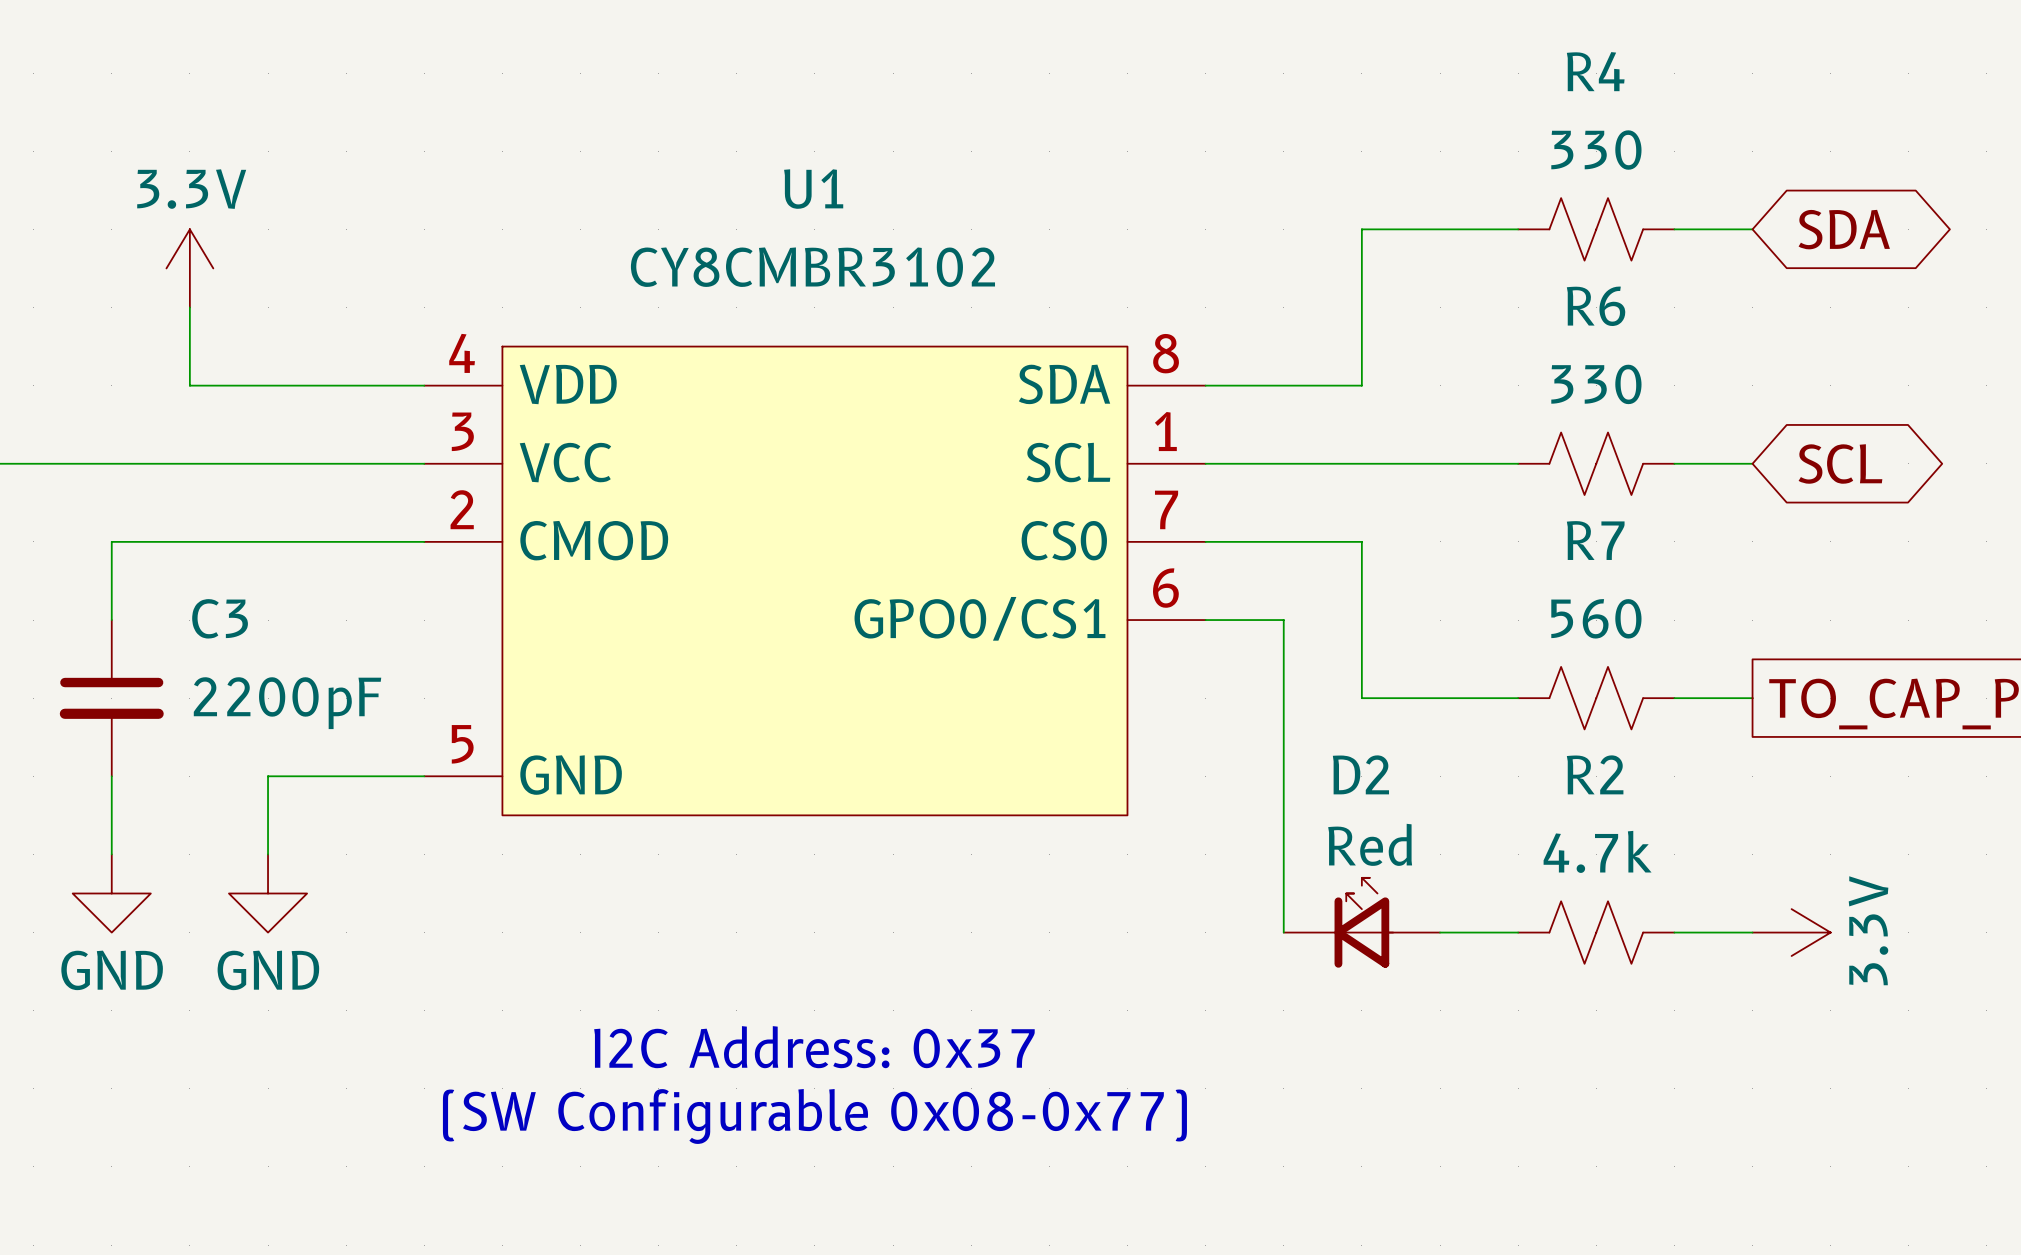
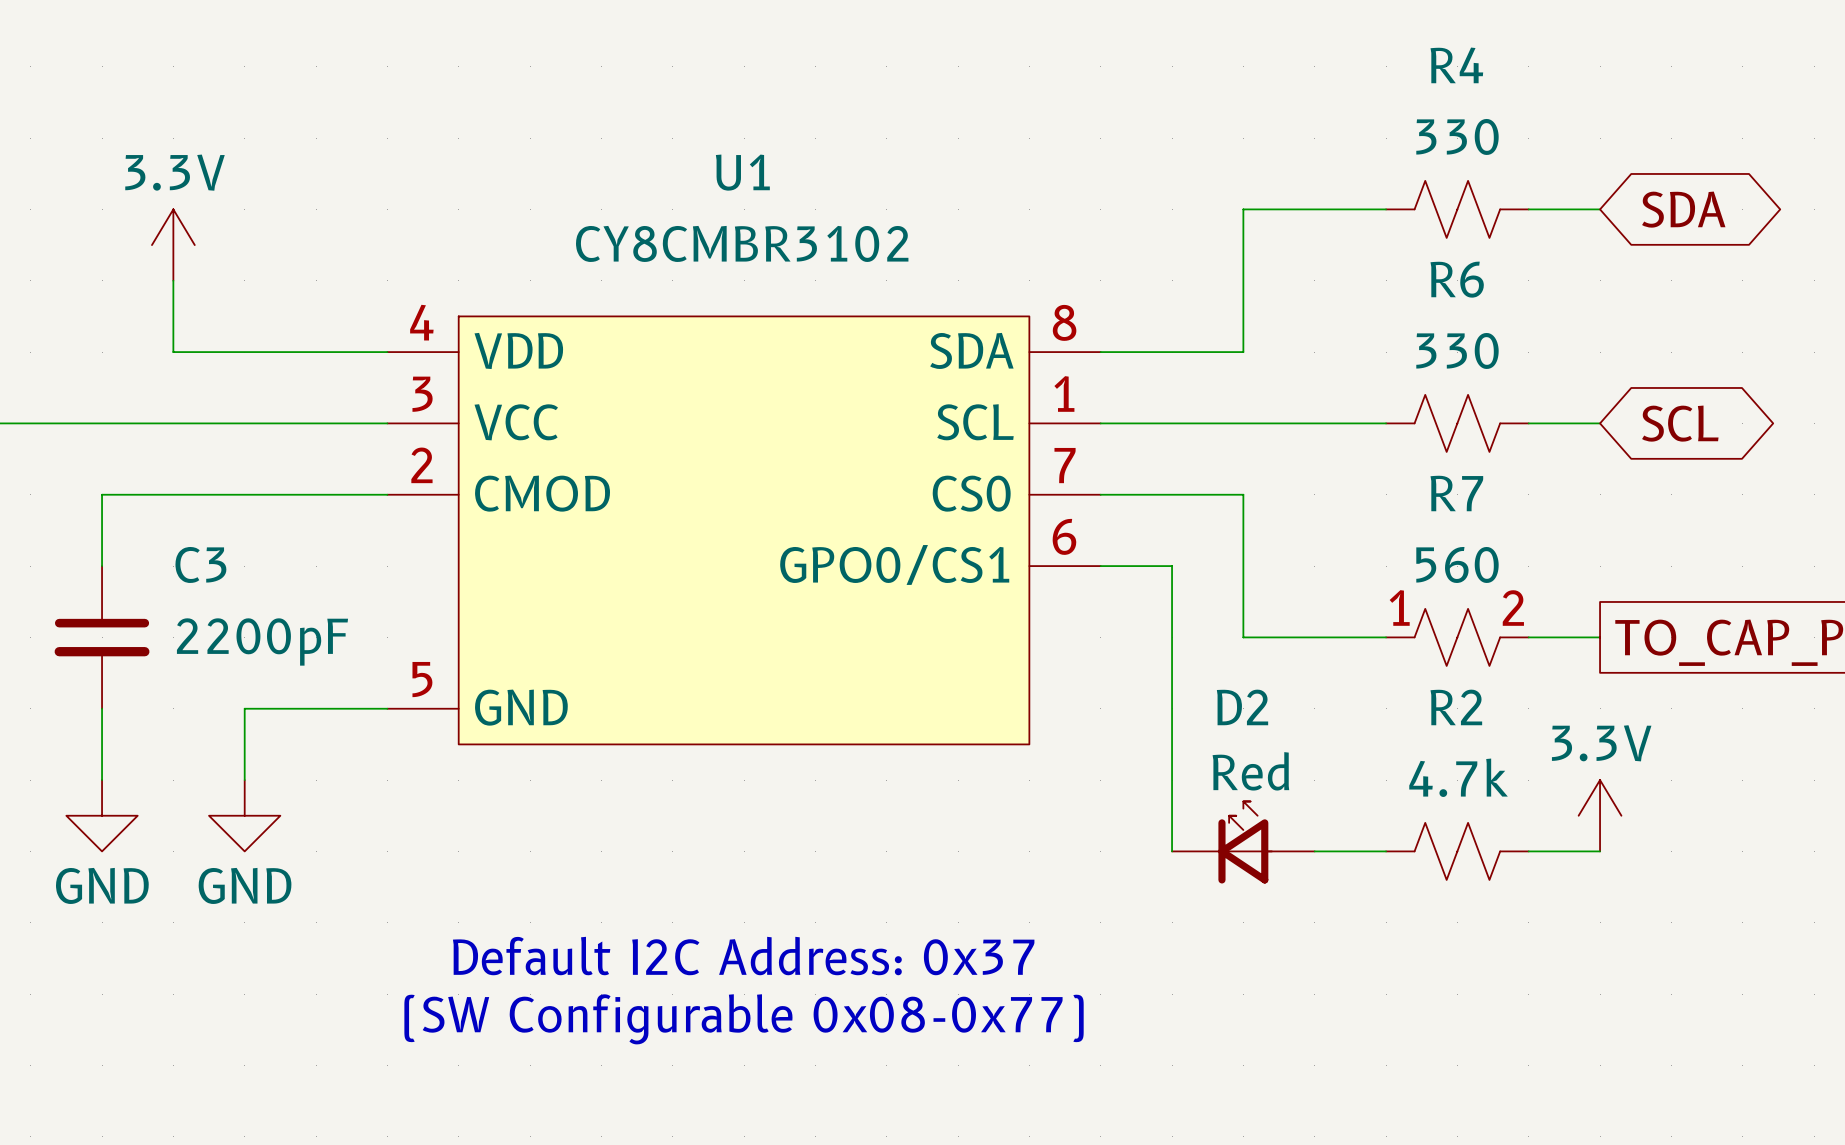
R7 pin number: none -> 1 (1399, 607)
R7 pin number: none -> 2 (1513, 608)
power symbol rotation: 0° (1791, 932) -> 90° counterclockwise (1600, 815)
power symbol position: 3.3V (1791, 932) -> 3.3V (1600, 815)
text: I2C Address: 0x37 (814, 1047) -> Default I2C Address: 0x37 (743, 956)

